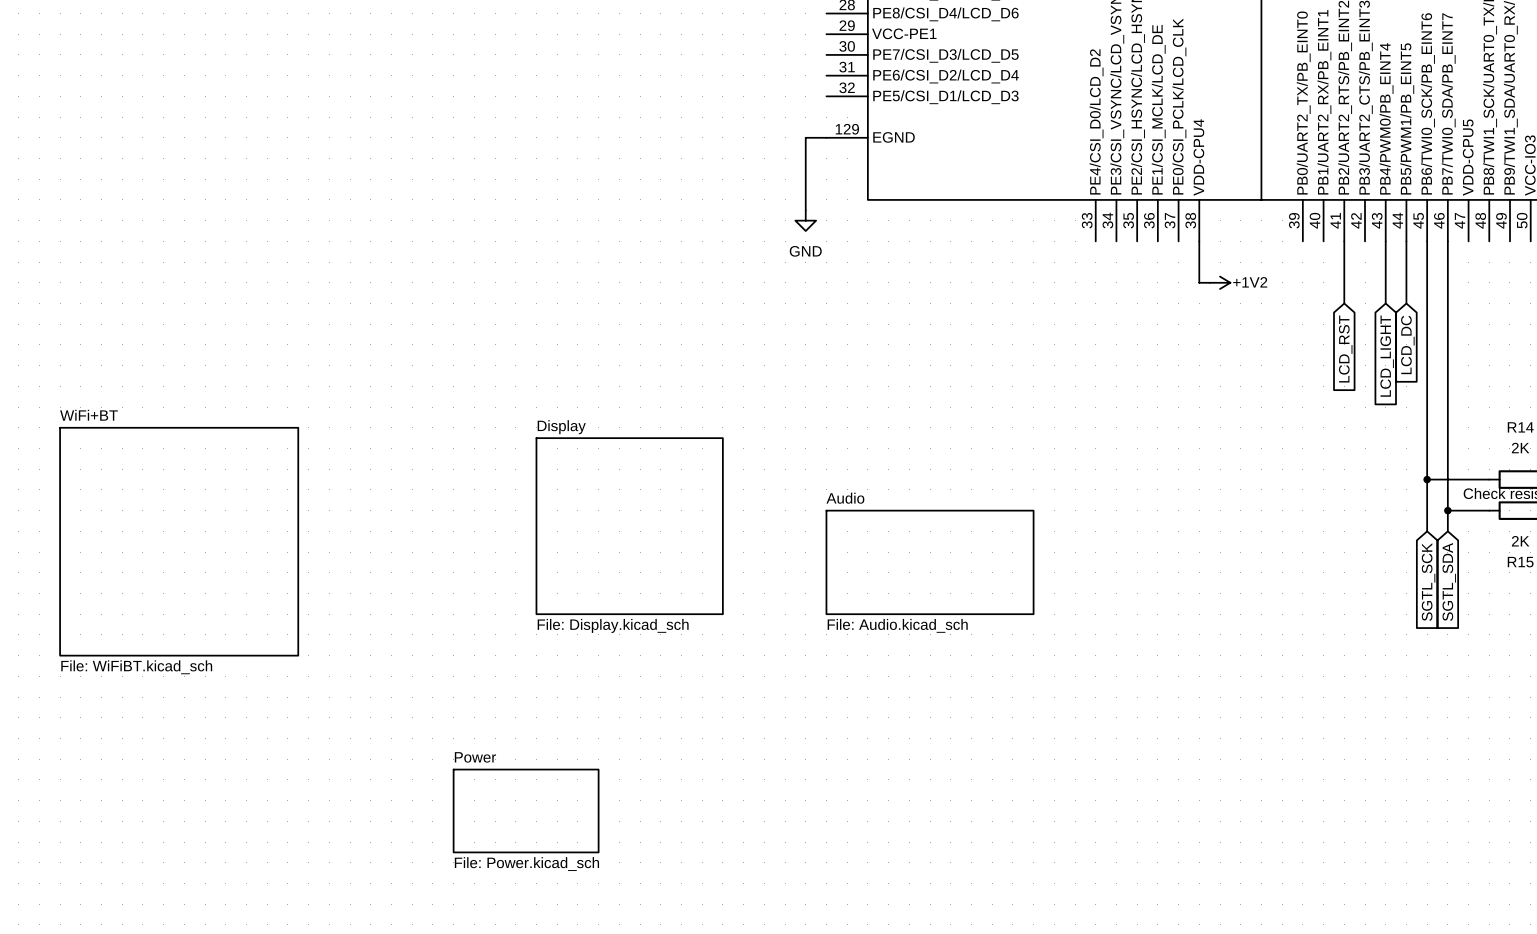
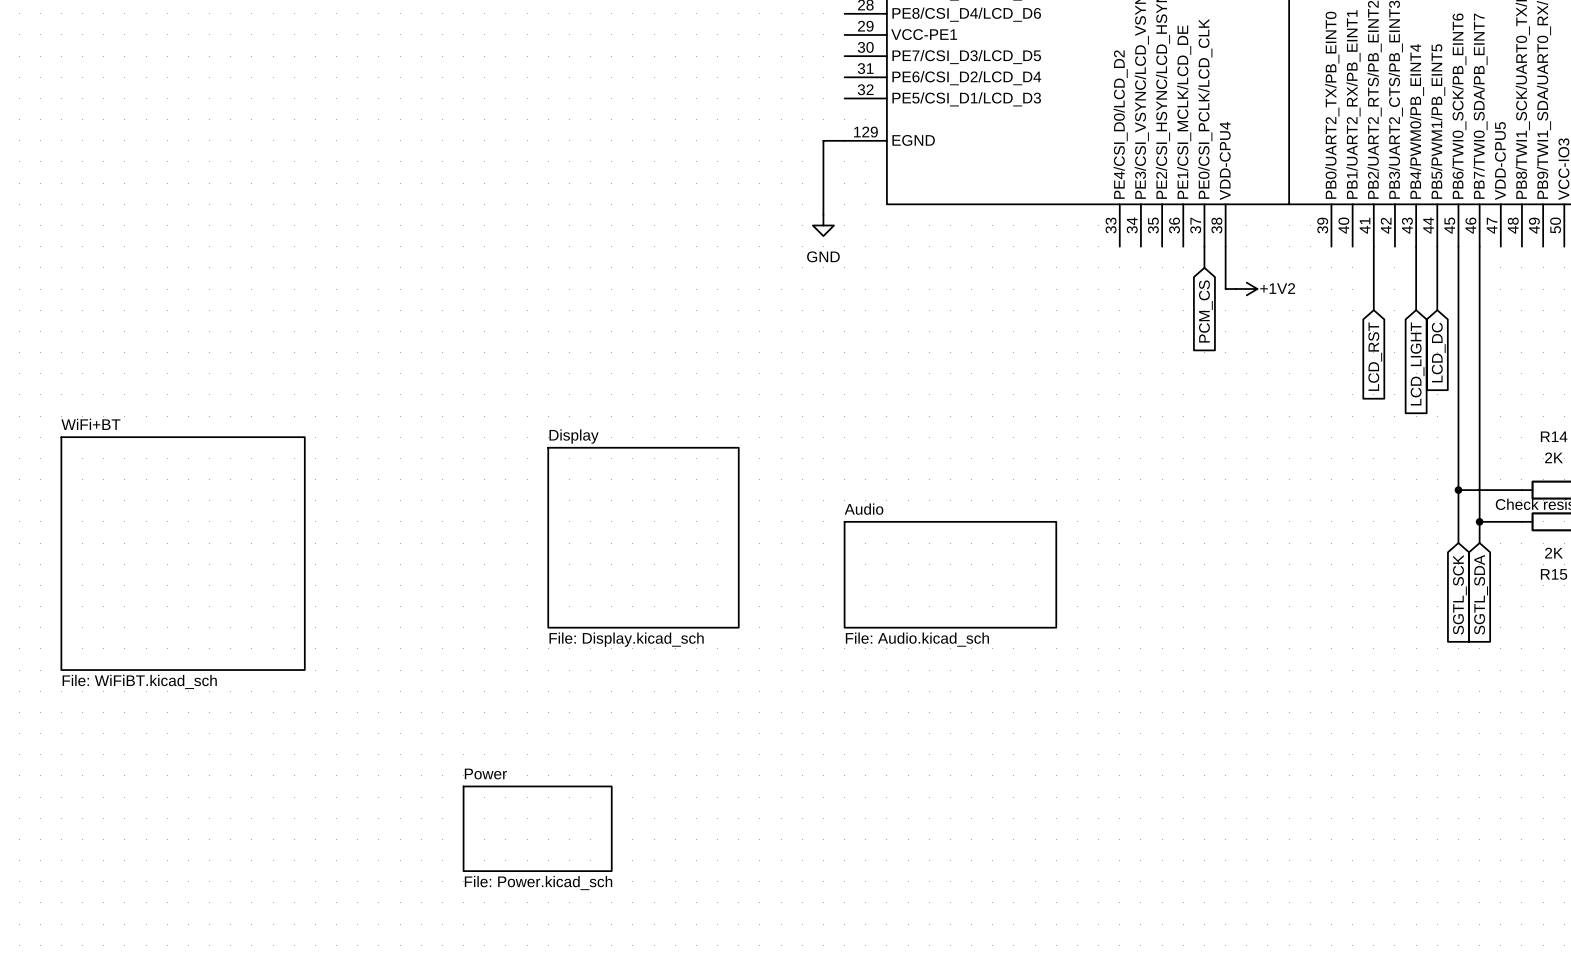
wire: none -> (1204, 246) (1204, 267)
global label: none -> PCM_CS (1205, 311)

